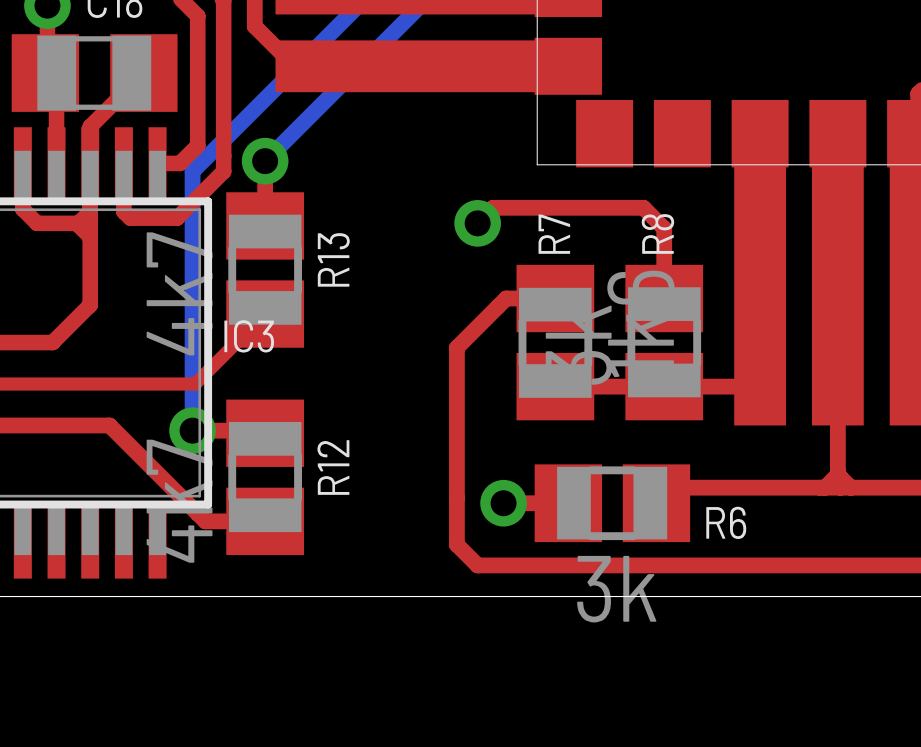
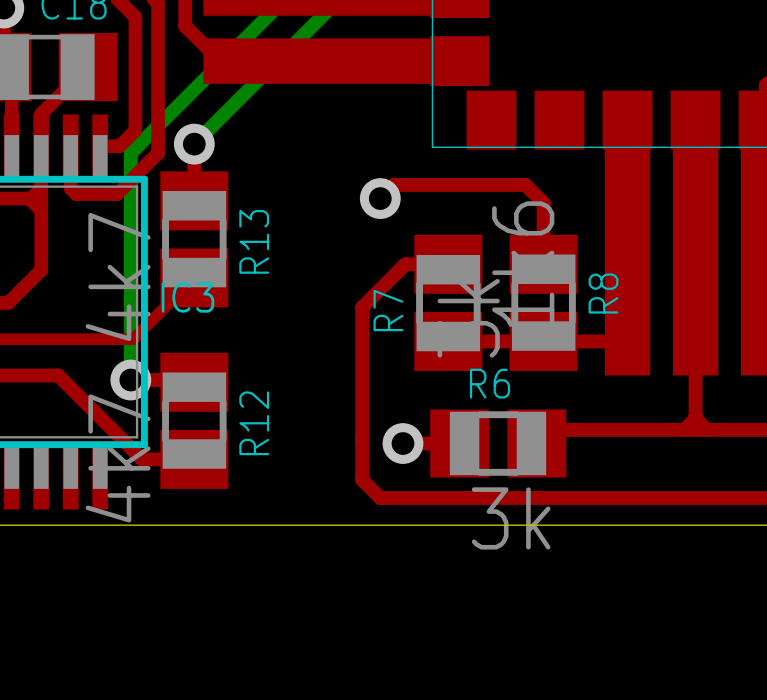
R8 name position: R8 (657, 233) -> R8 (603, 293)
R7 name position: R7 (554, 234) -> R7 (388, 310)
R6 name position: R6 (726, 522) -> R6 (490, 383)

